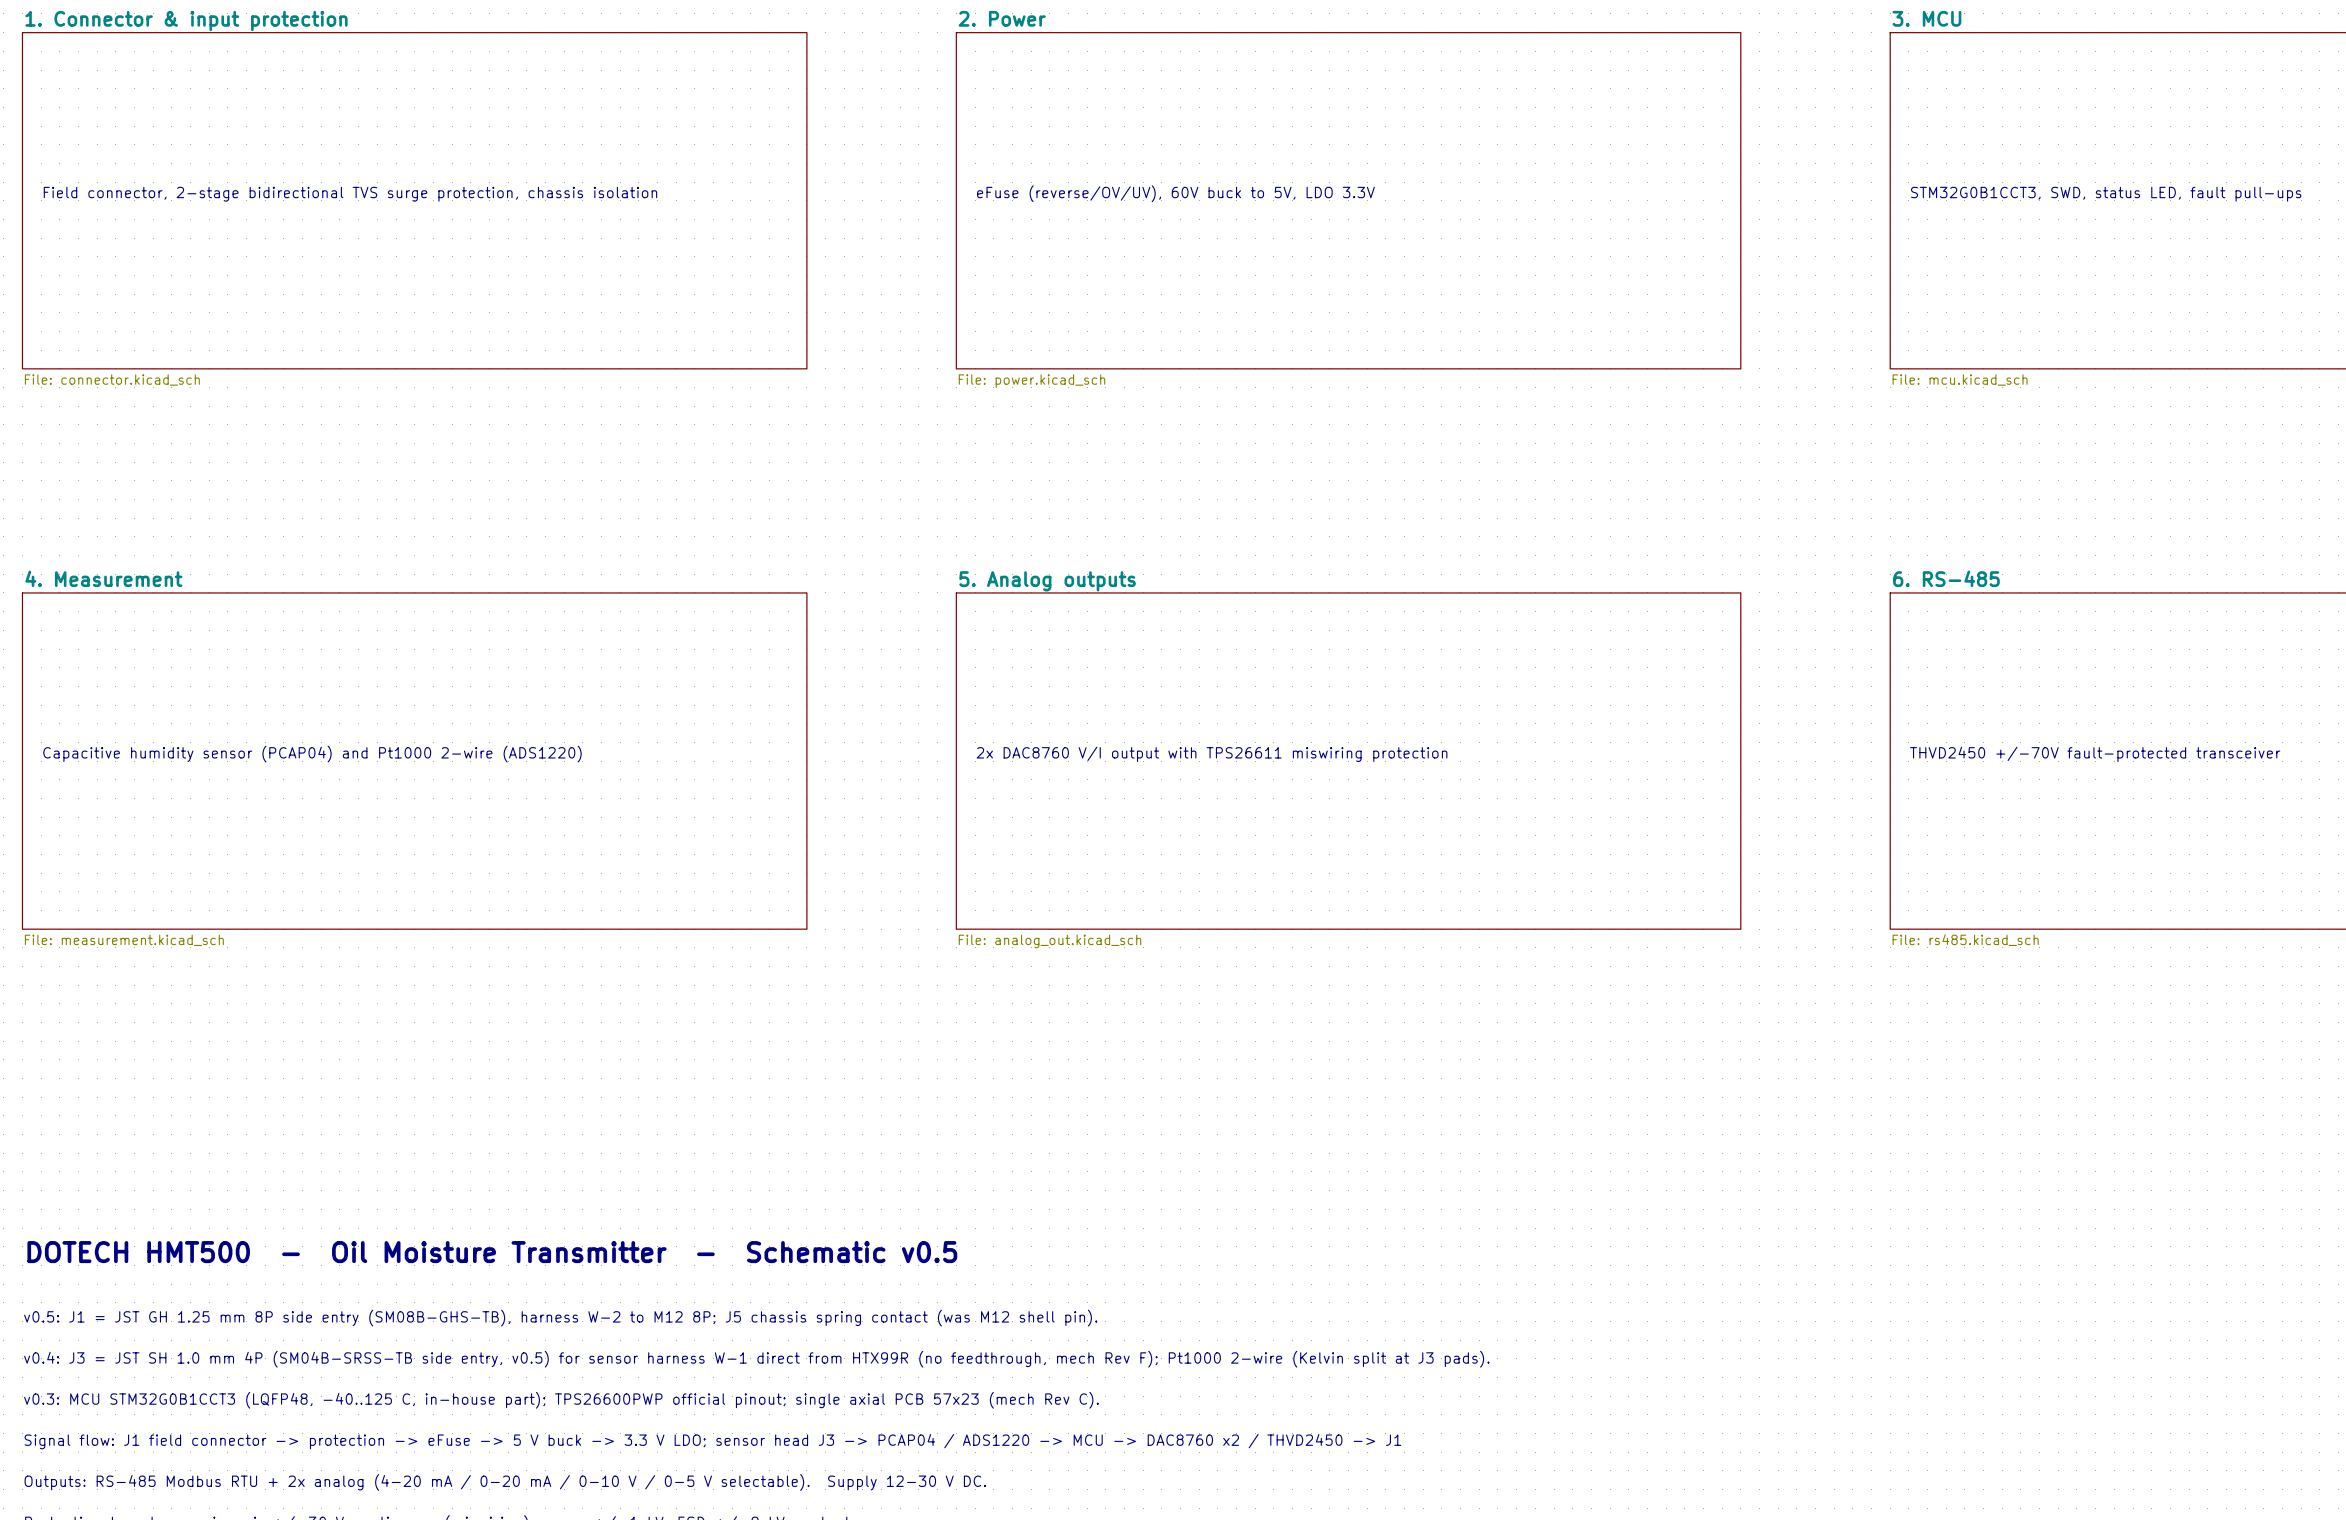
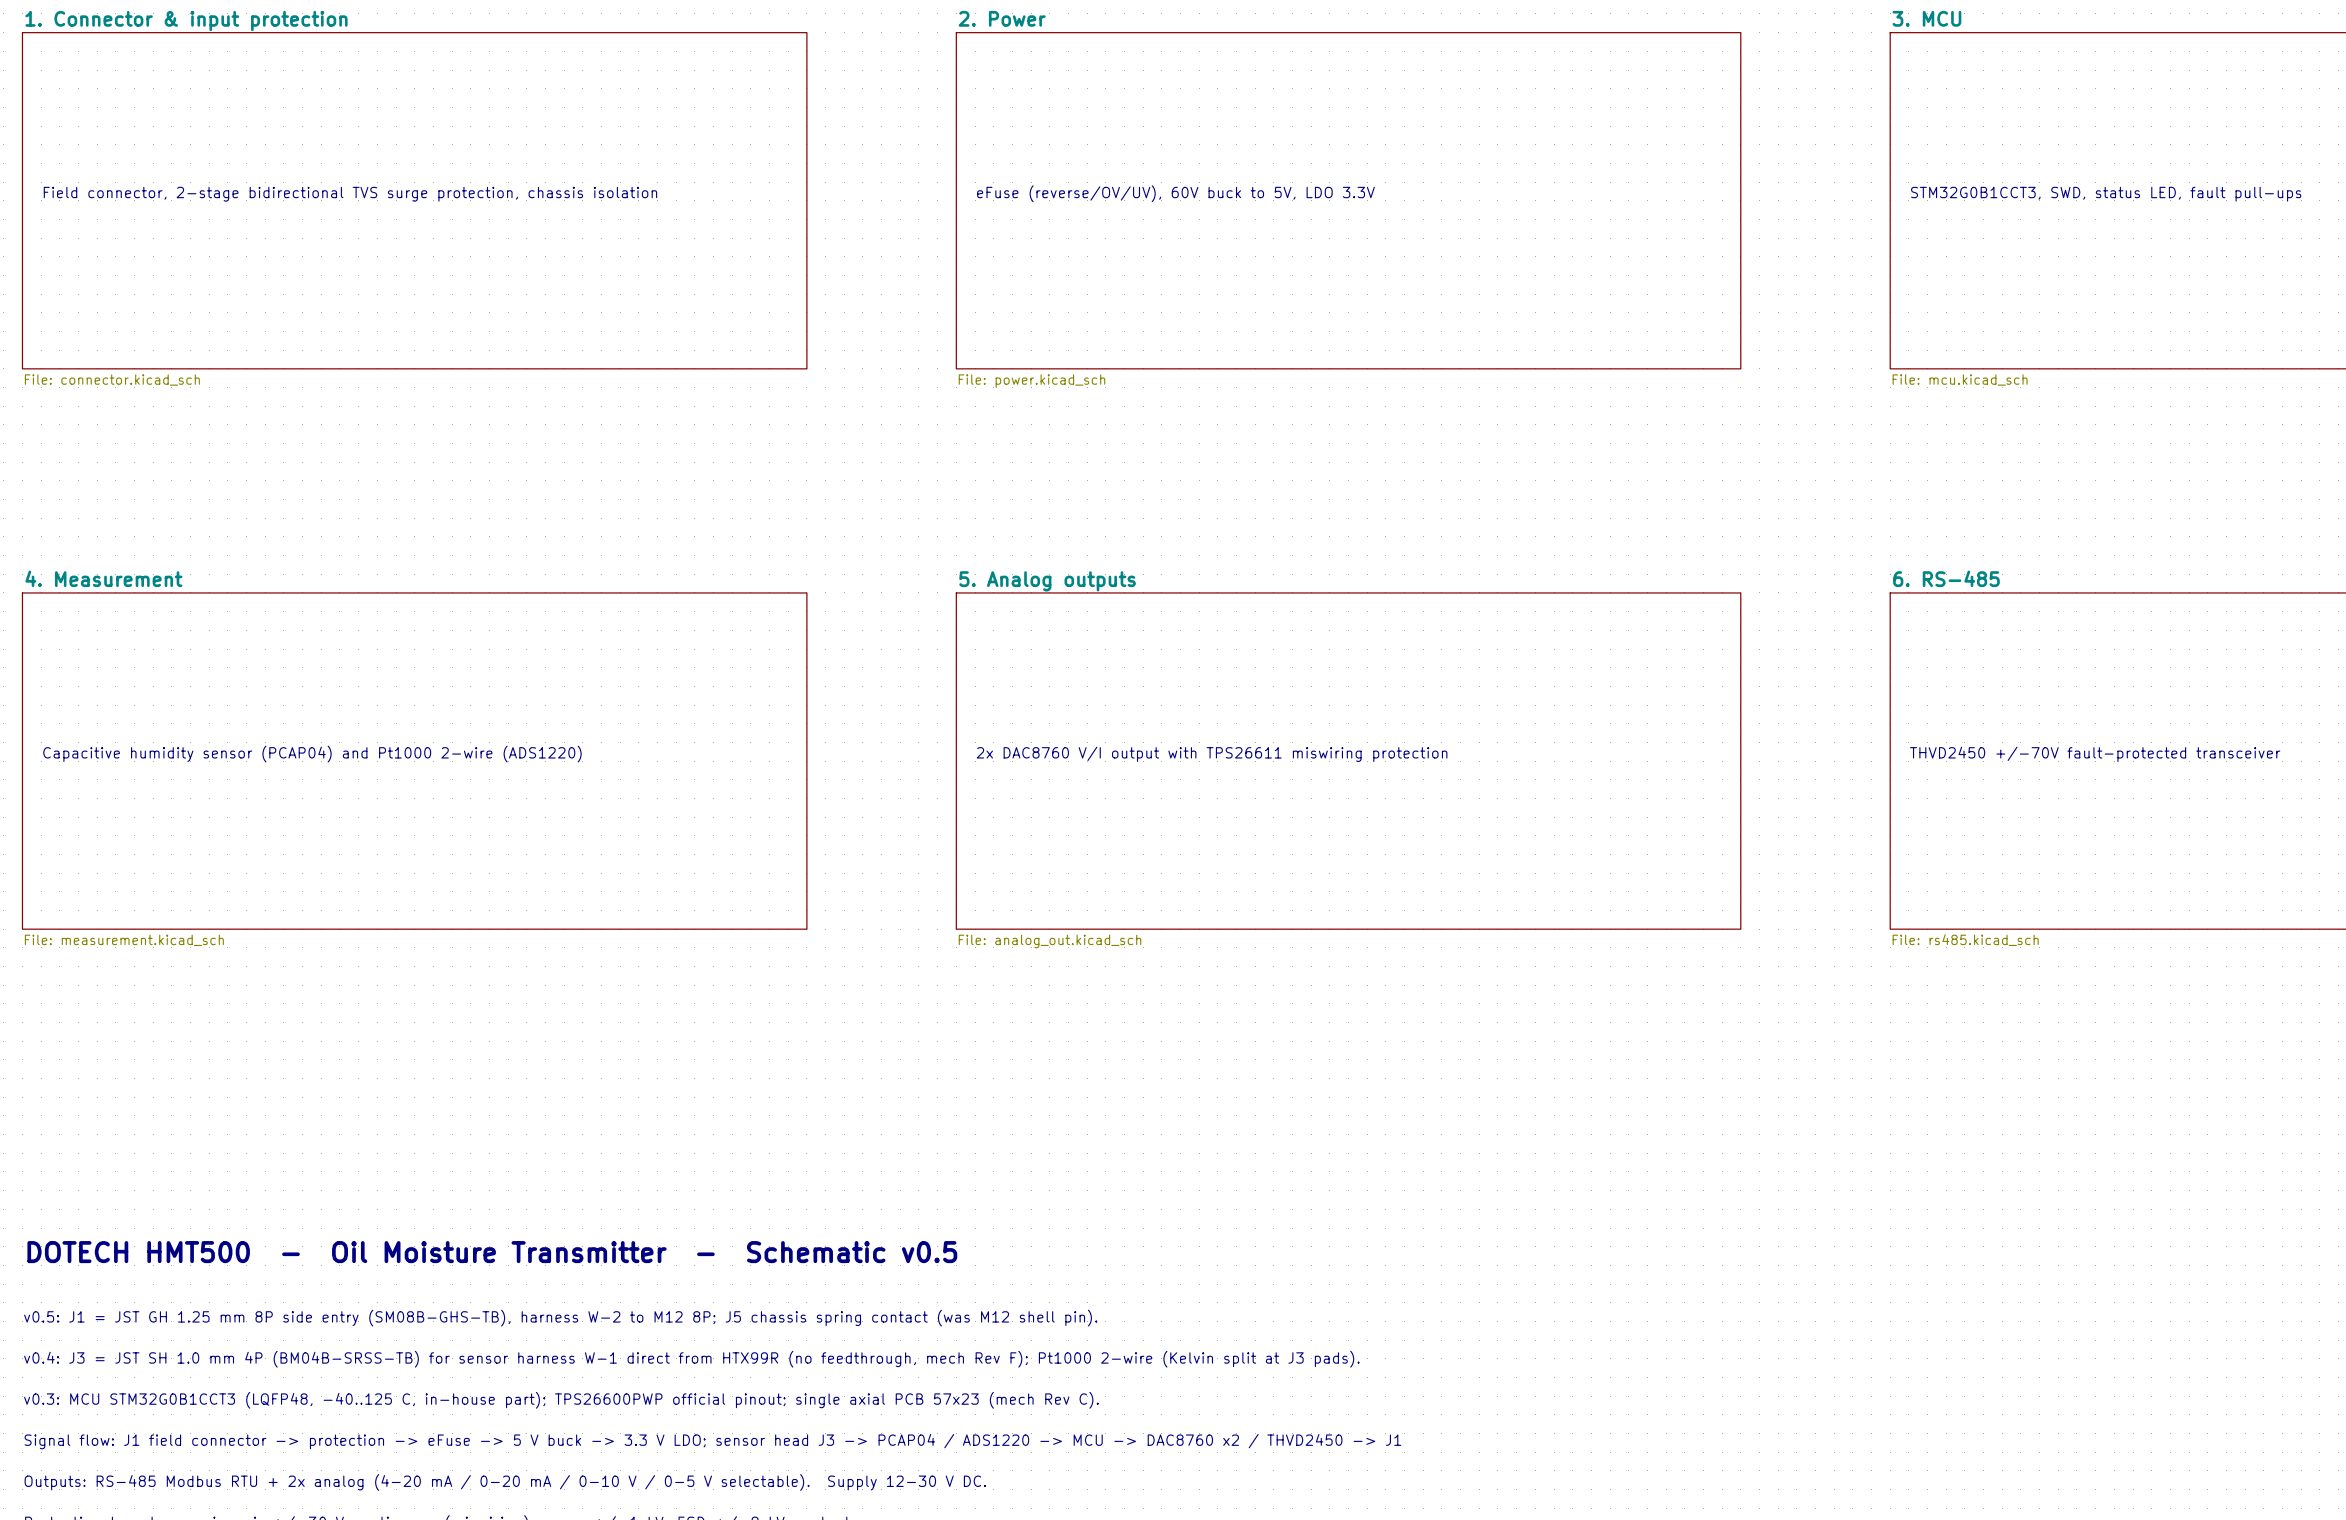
text: v0.4: J3 = JST SH 1.0 mm 4P (SM04B-SRSS-TB side entry, v0.5) for sensor harness W-1 direct from HTX99R (no feedthrough, mech Rev F); Pt1000 2-wire (Kelvin split at J3 pads). (756, 1359) -> v0.4: J3 = JST SH 1.0 mm 4P (BM04B-SRSS-TB) for sensor harness W-1 direct from HTX99R (no feedthrough, mech Rev F); Pt1000 2-wire (Kelvin split at J3 pads). (691, 1359)

